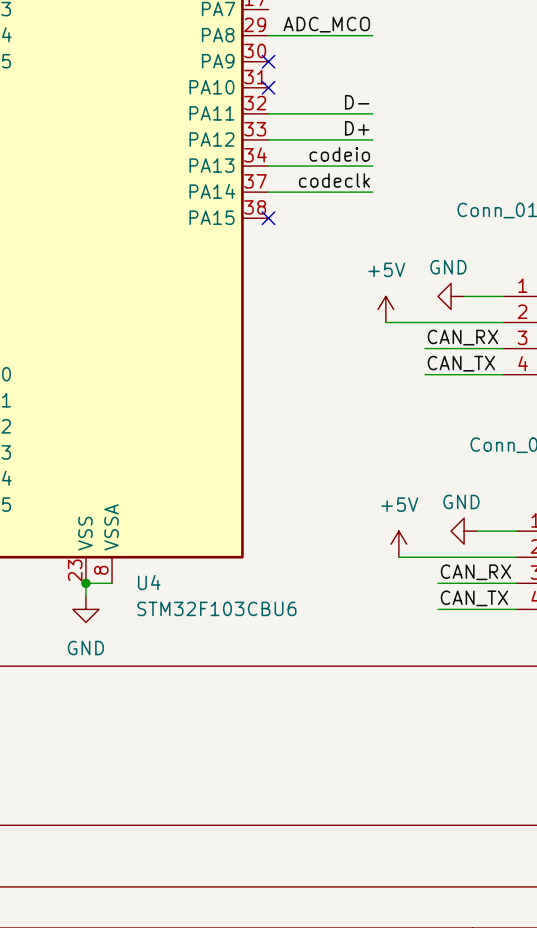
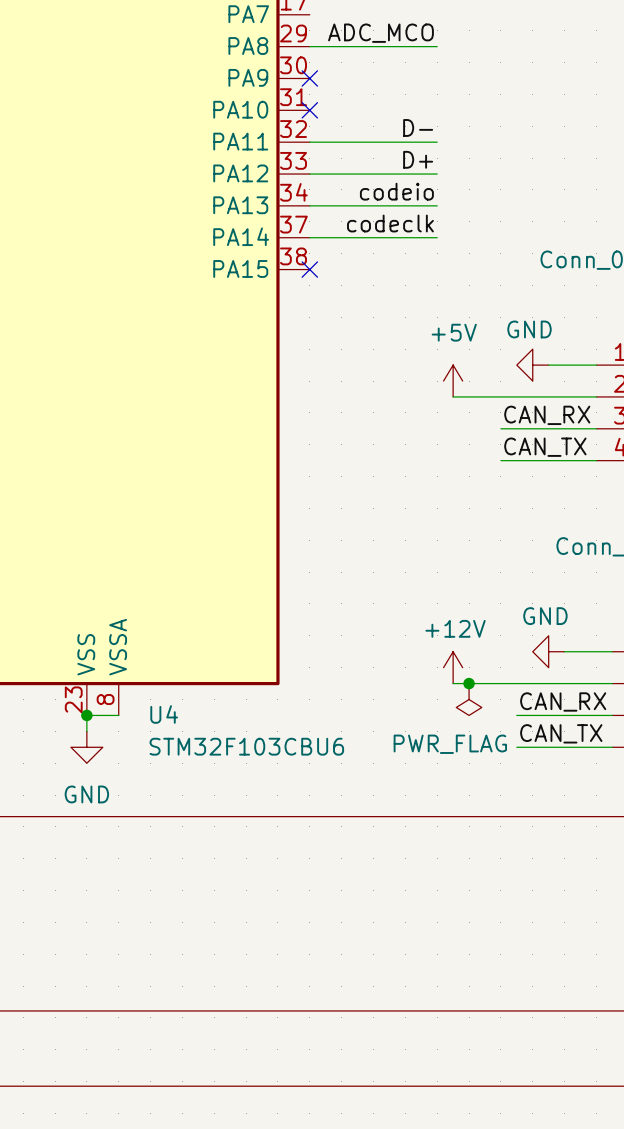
power symbol: none -> +12V (453, 667)
power symbol: +5V (398, 544) -> none
wire: none -> (453, 683) (469, 683)
junction: none -> (469, 683)
power symbol: none -> PWR_FLAG (469, 699)

